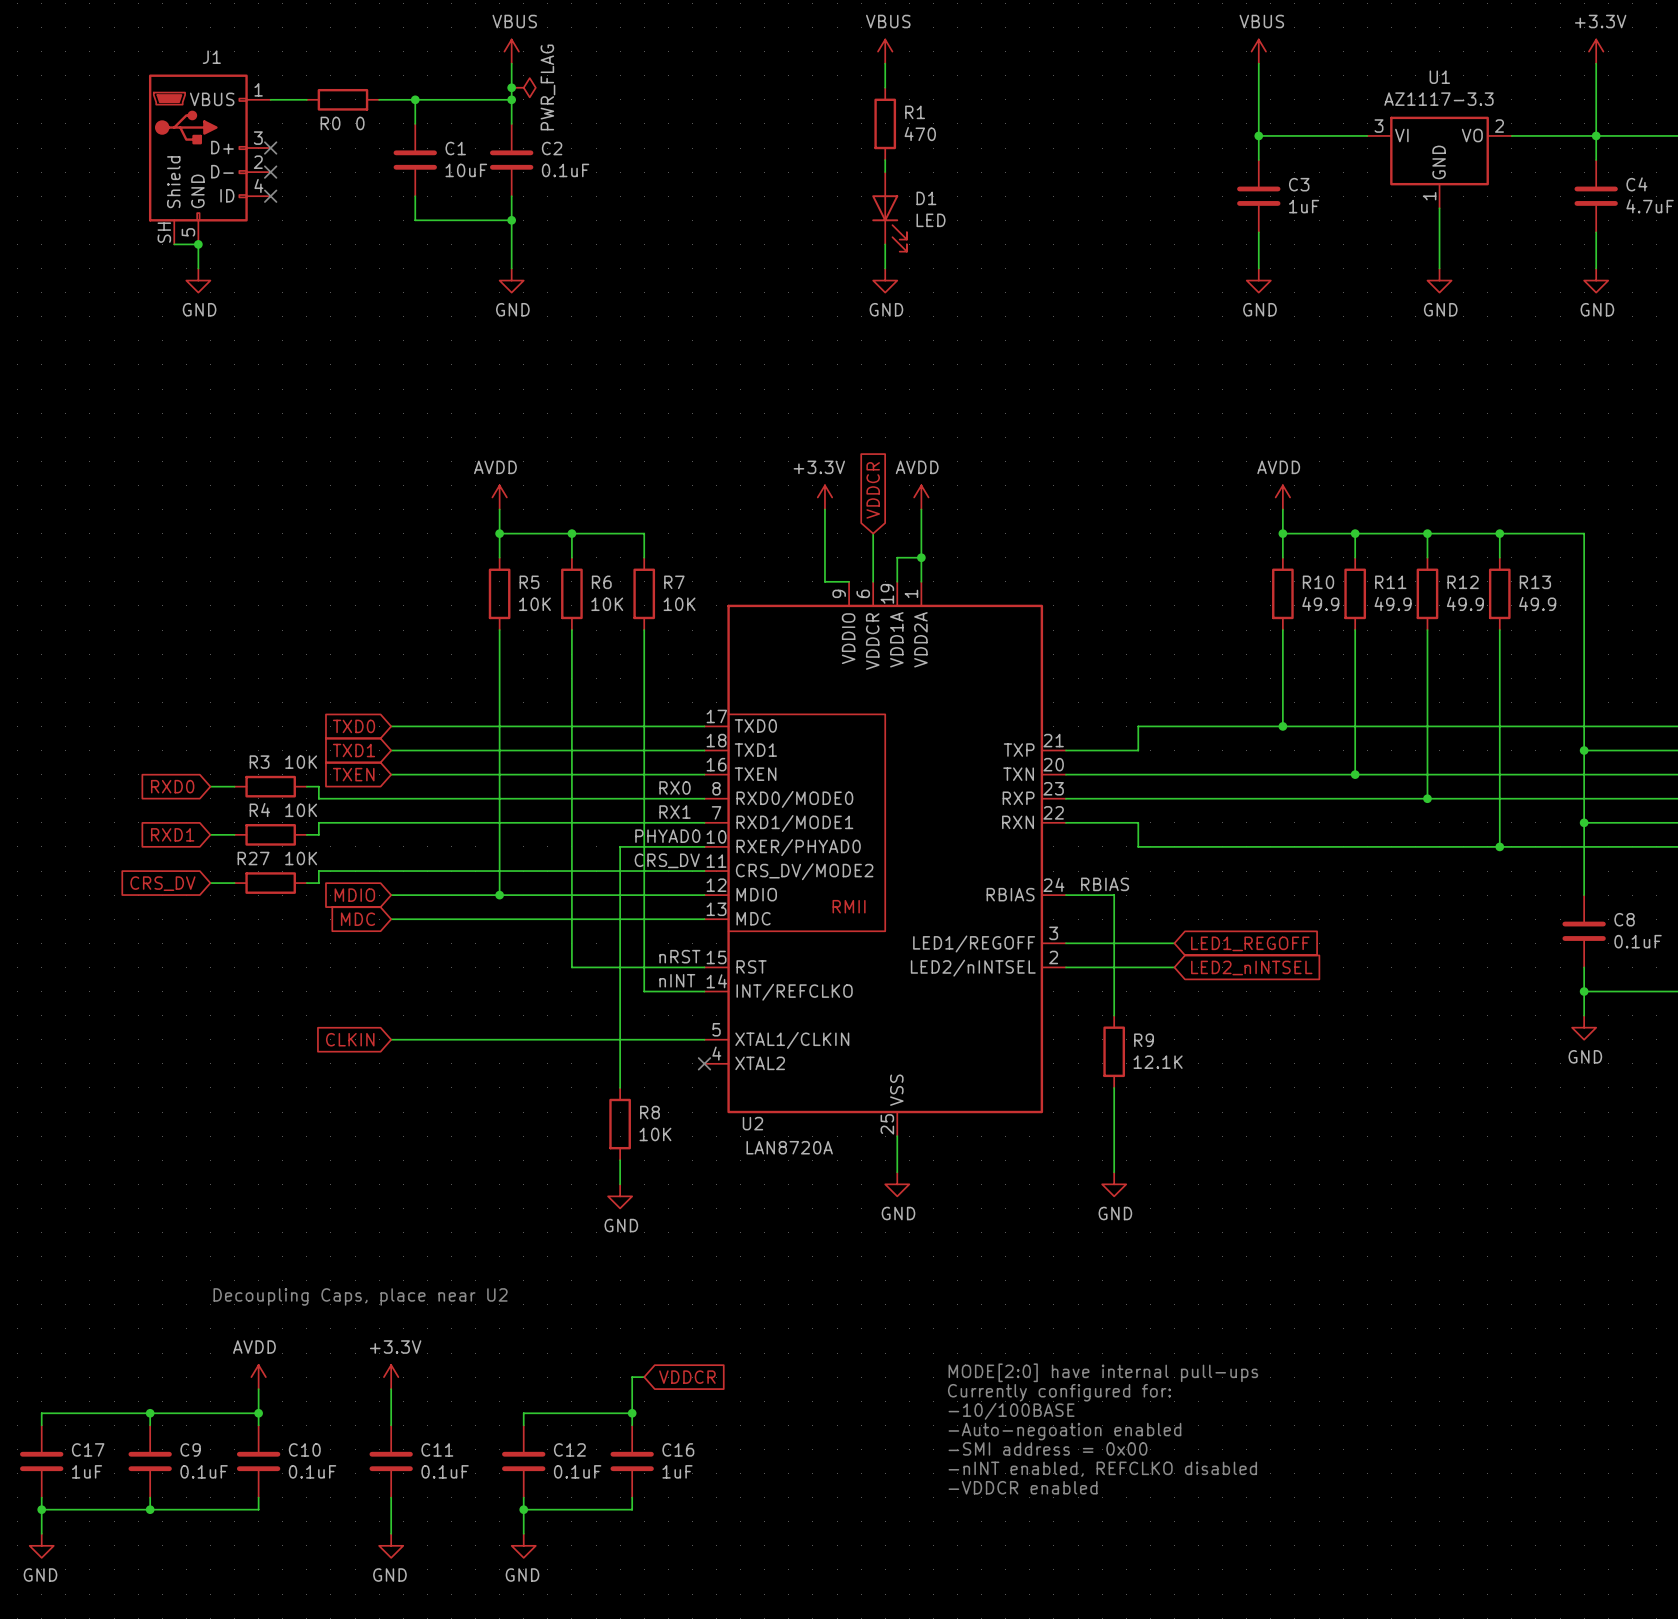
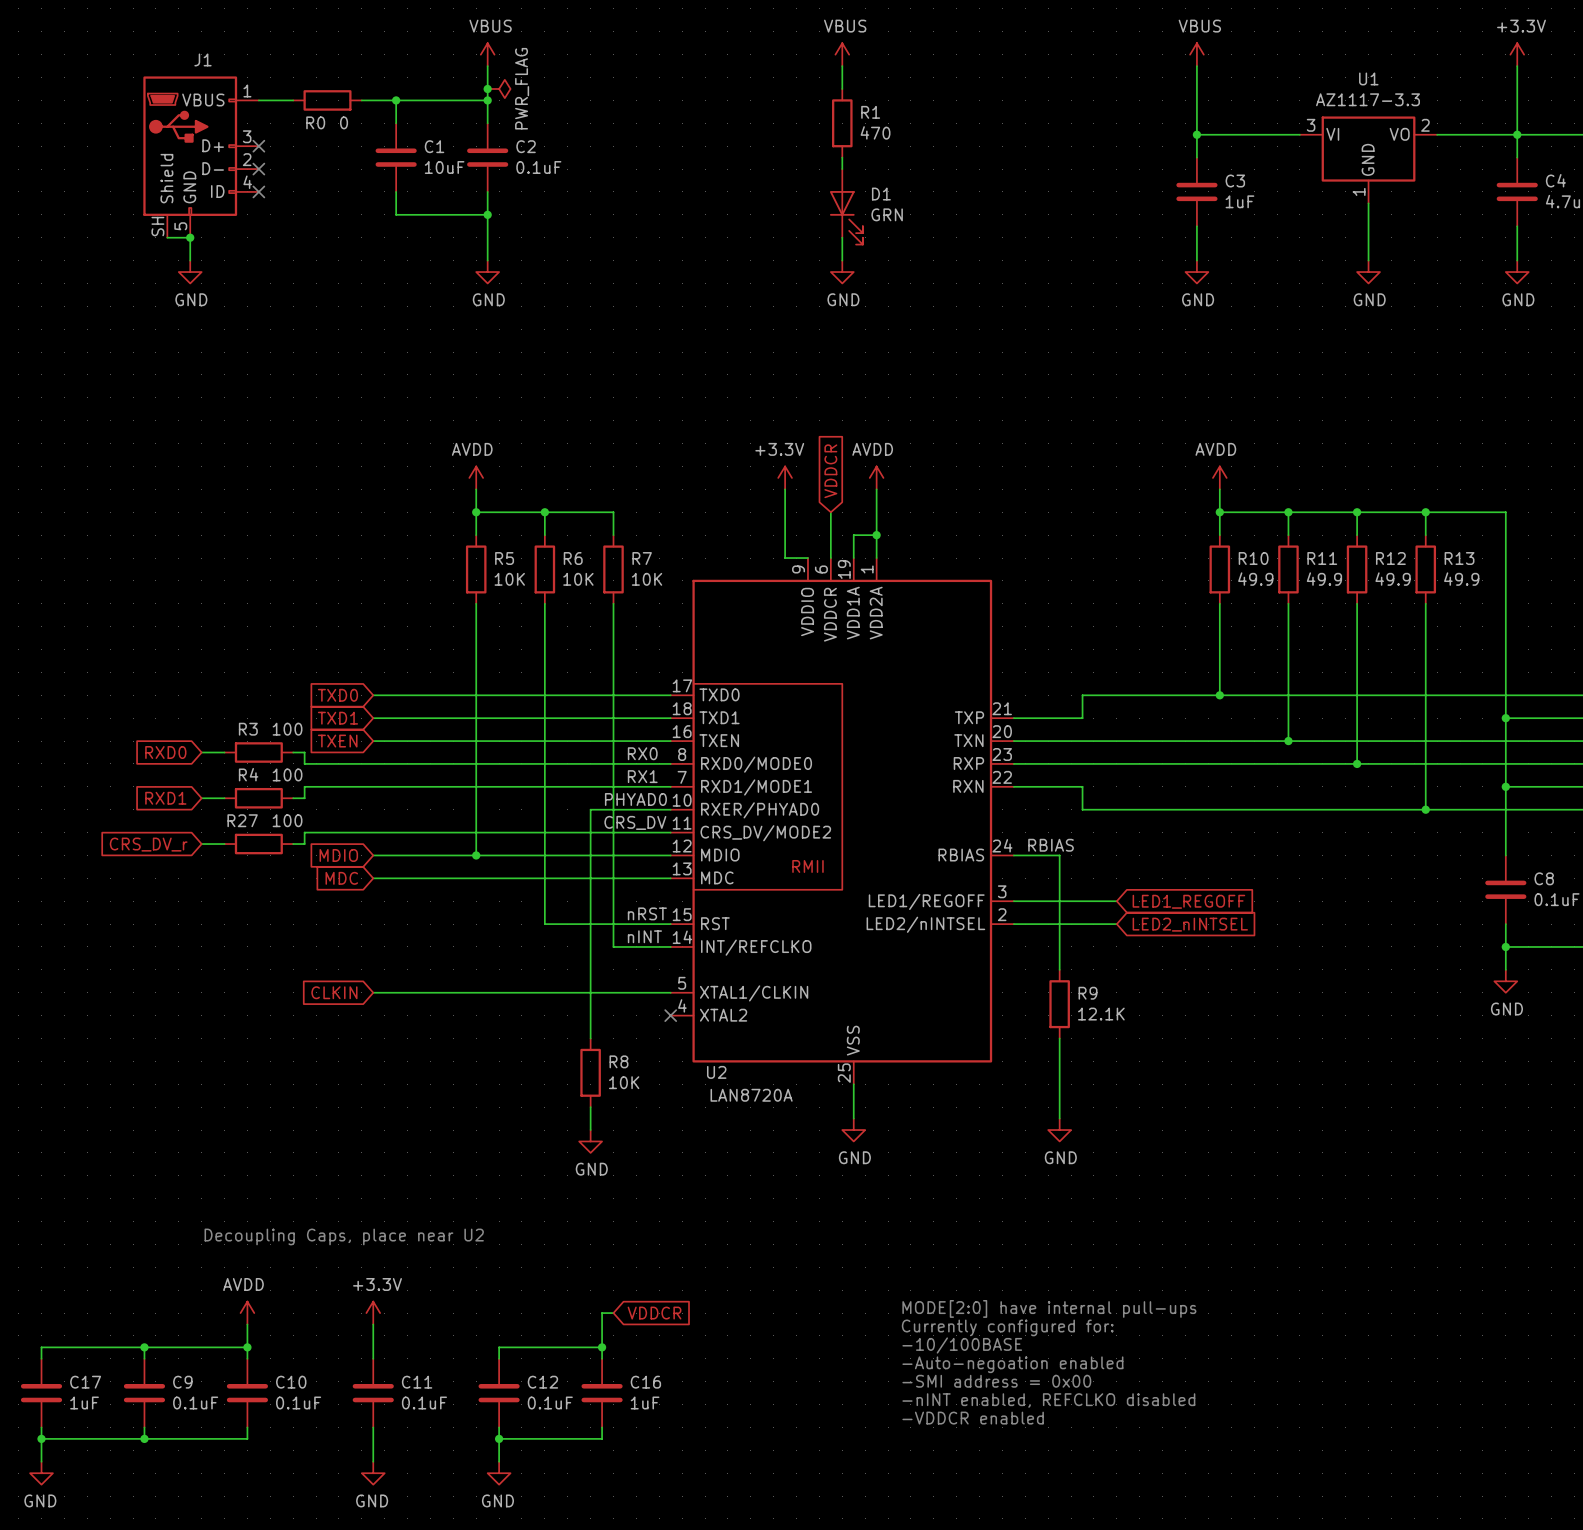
D1 value: LED (931, 220) -> GRN (887, 214)
R3 value: 10K (301, 762) -> 100 (287, 729)
R4 value: 10K (301, 810) -> 100 (287, 774)
R27 value: 10K (301, 858) -> 100 (287, 820)
global label: CRS_DV (162, 883) -> CRS_DV_r (148, 844)

